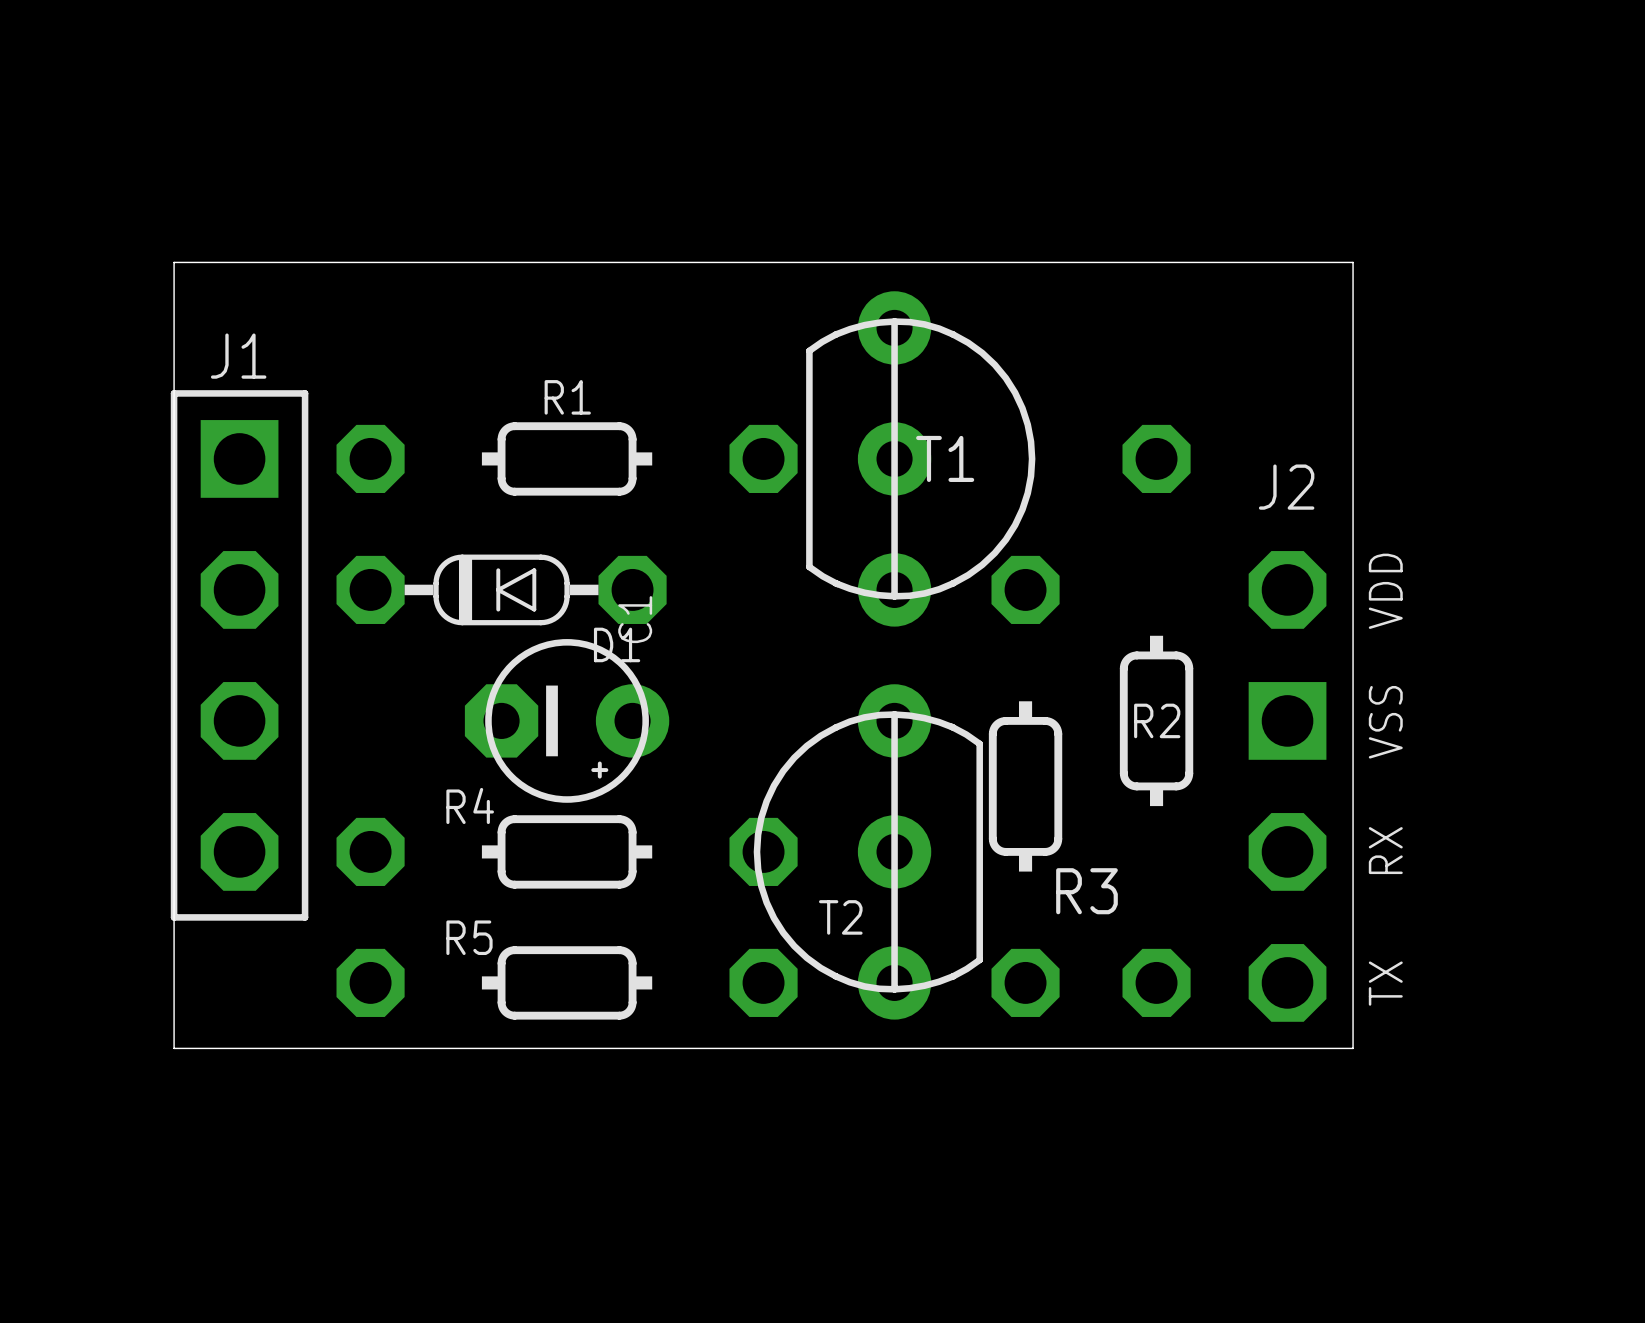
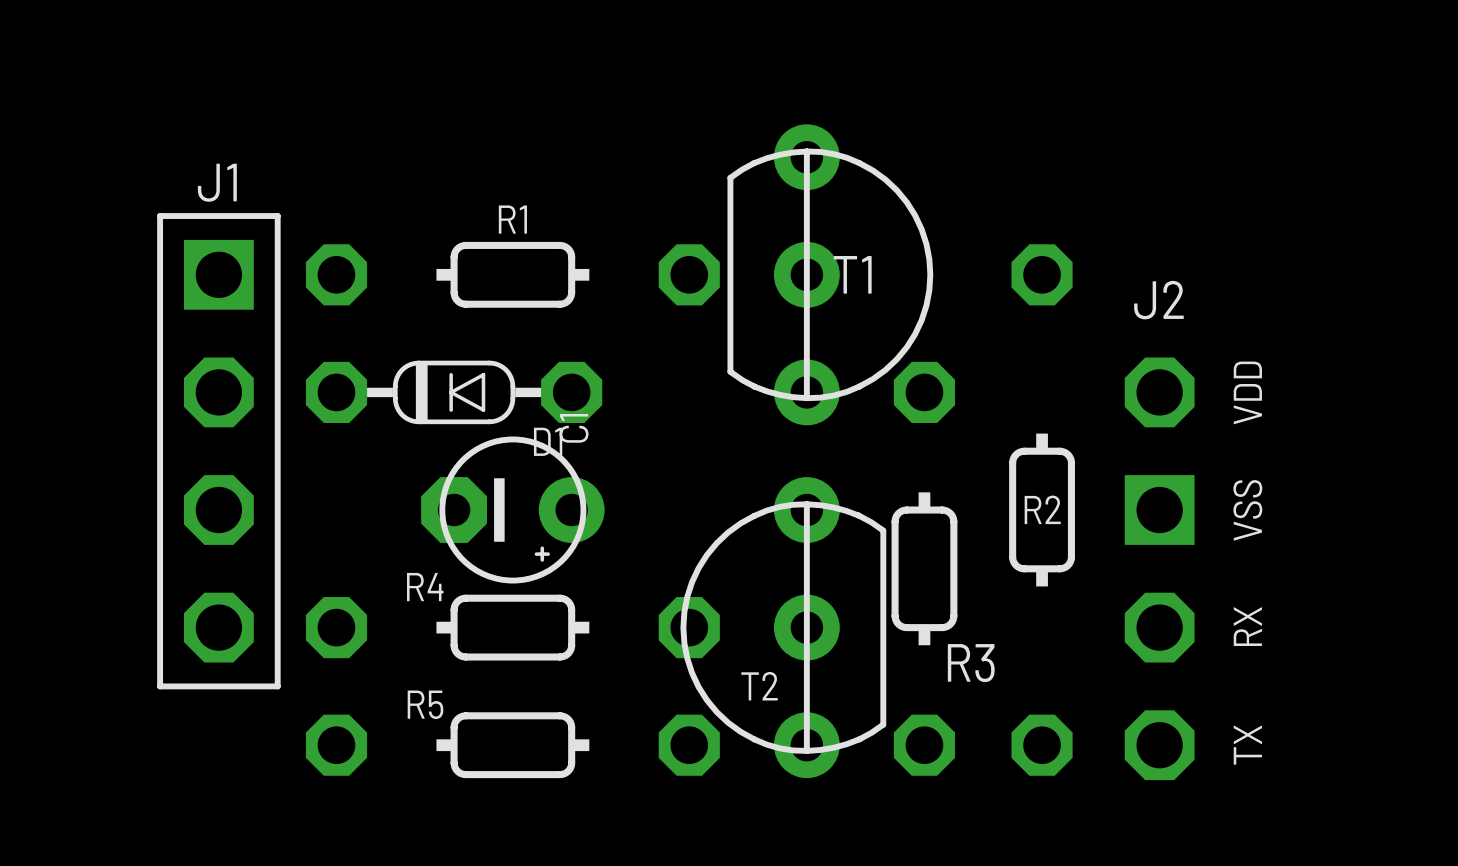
board edge: (174, 262) (1353, 262) (1353, 1048) (174, 1048) (174, 262) -> none

